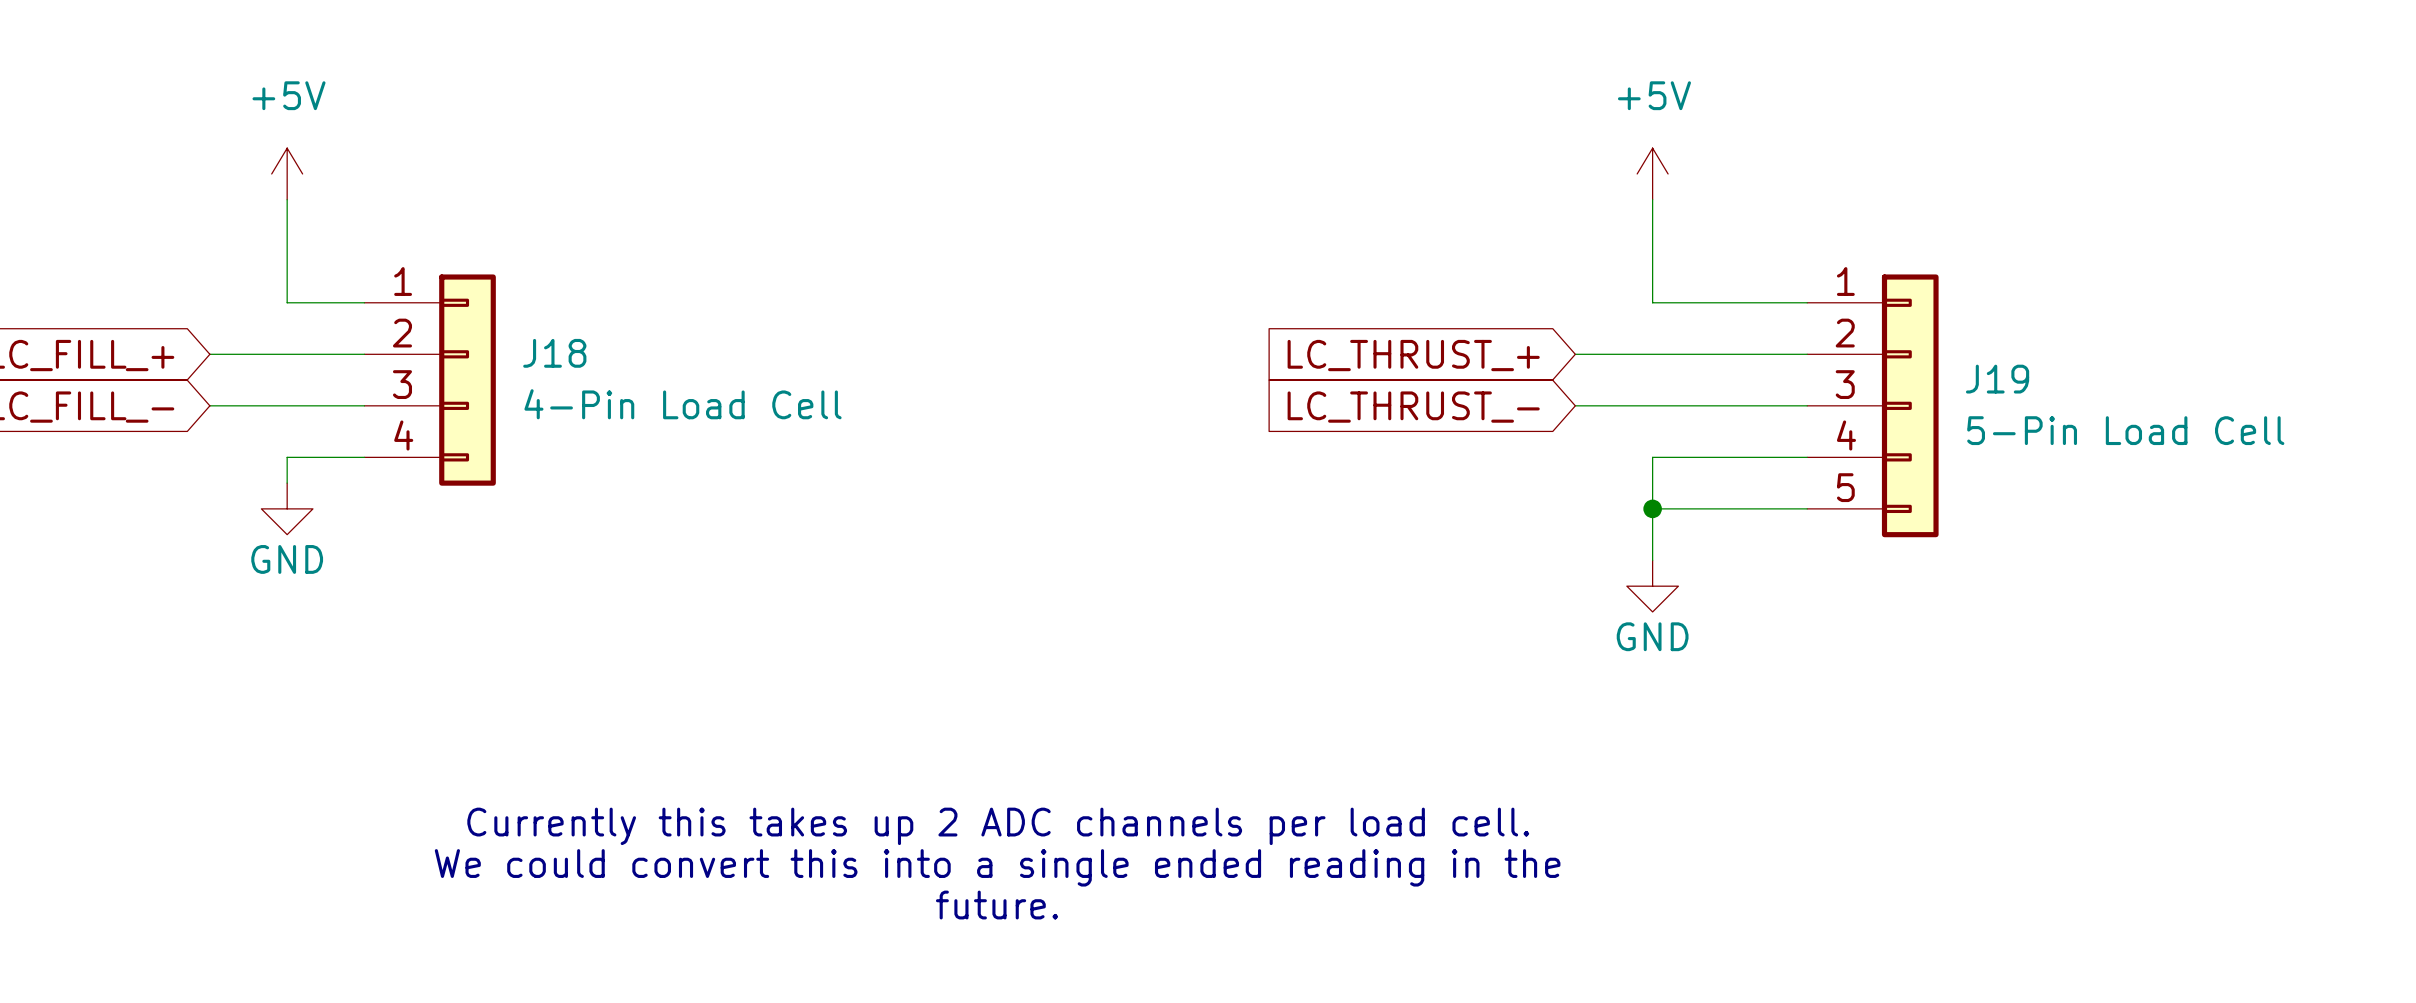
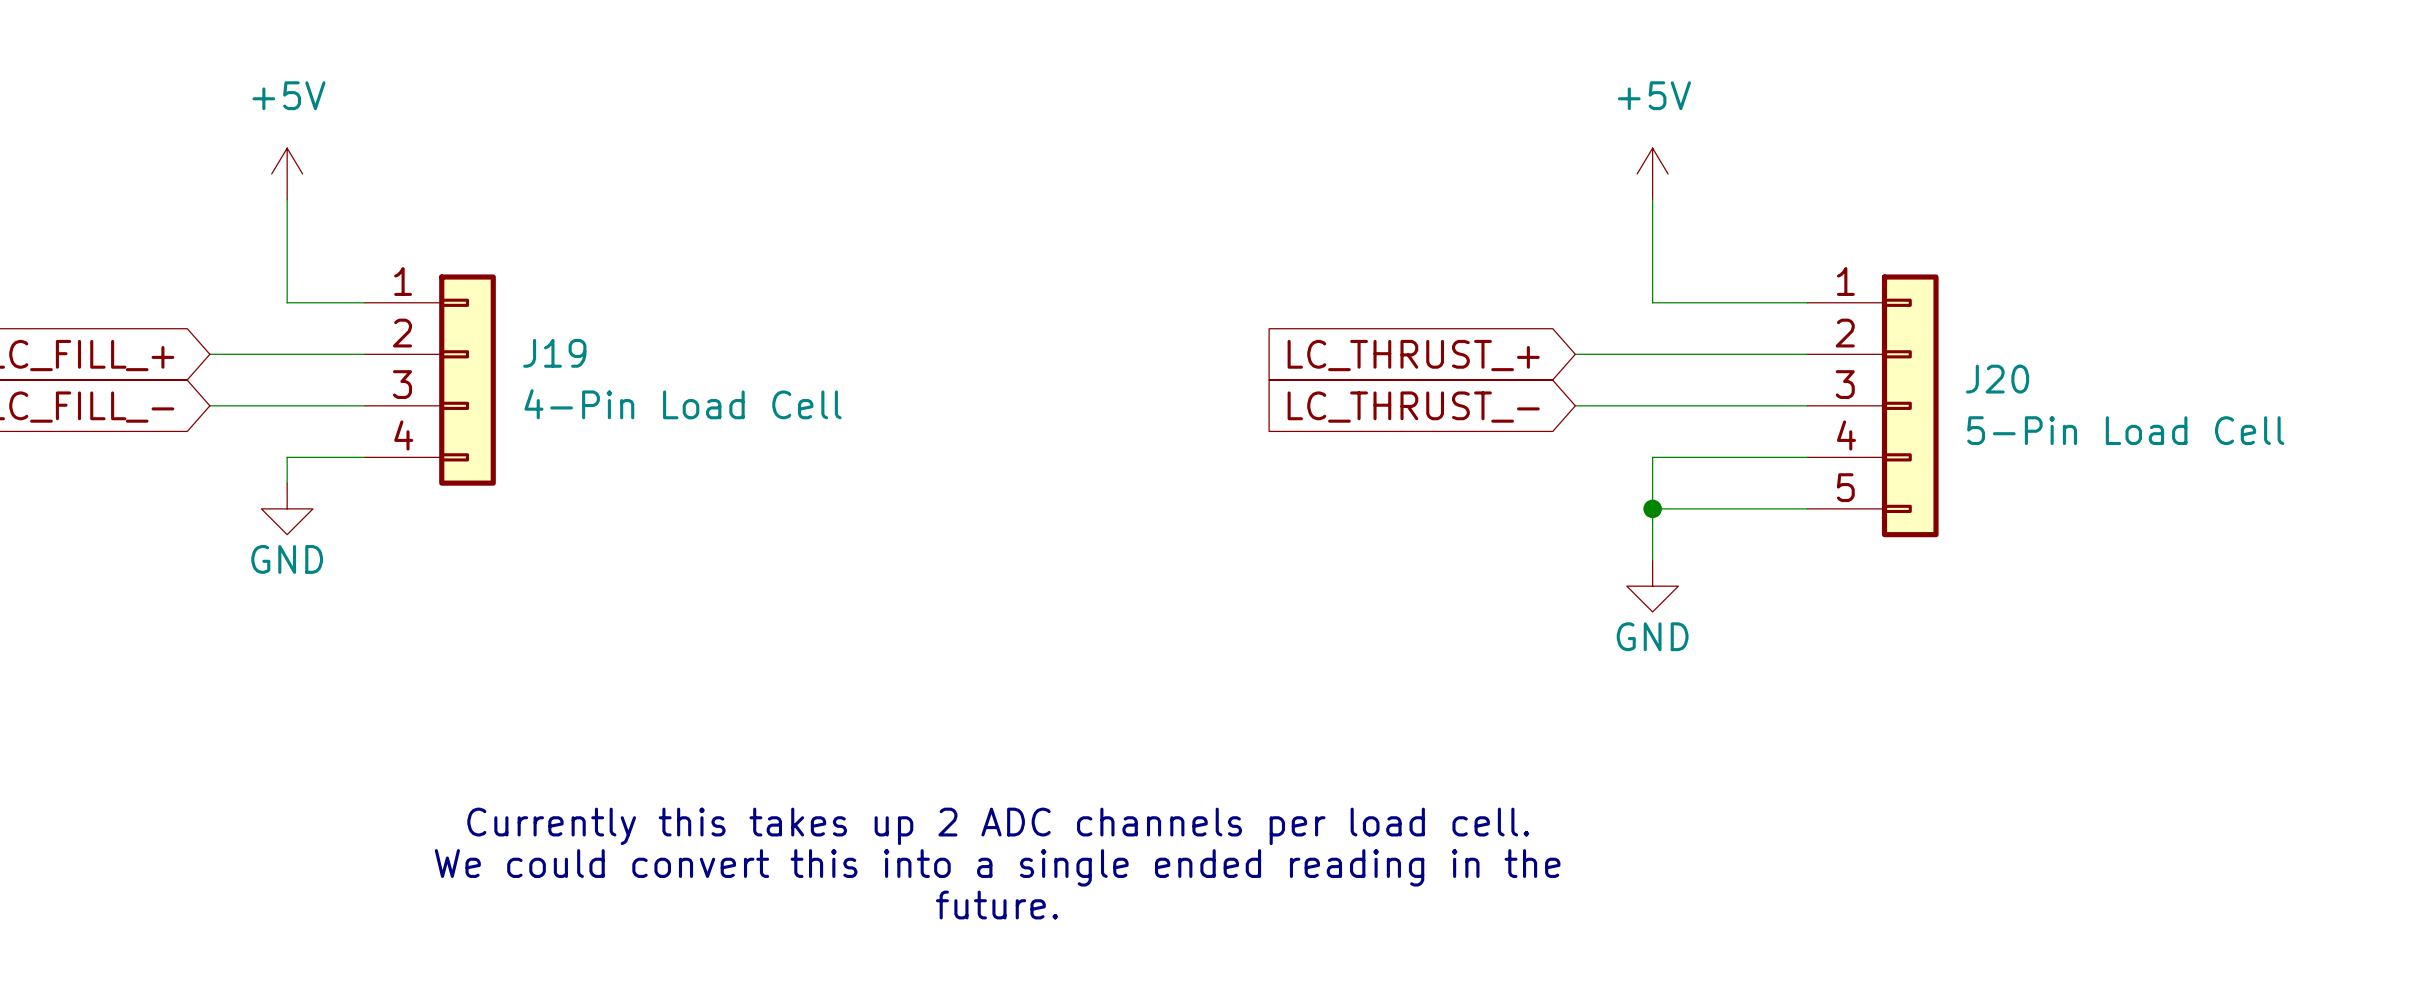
J18 name: J18 (554, 353) -> J19 (554, 353)
J19 name: J19 (1997, 379) -> J20 (1997, 379)

